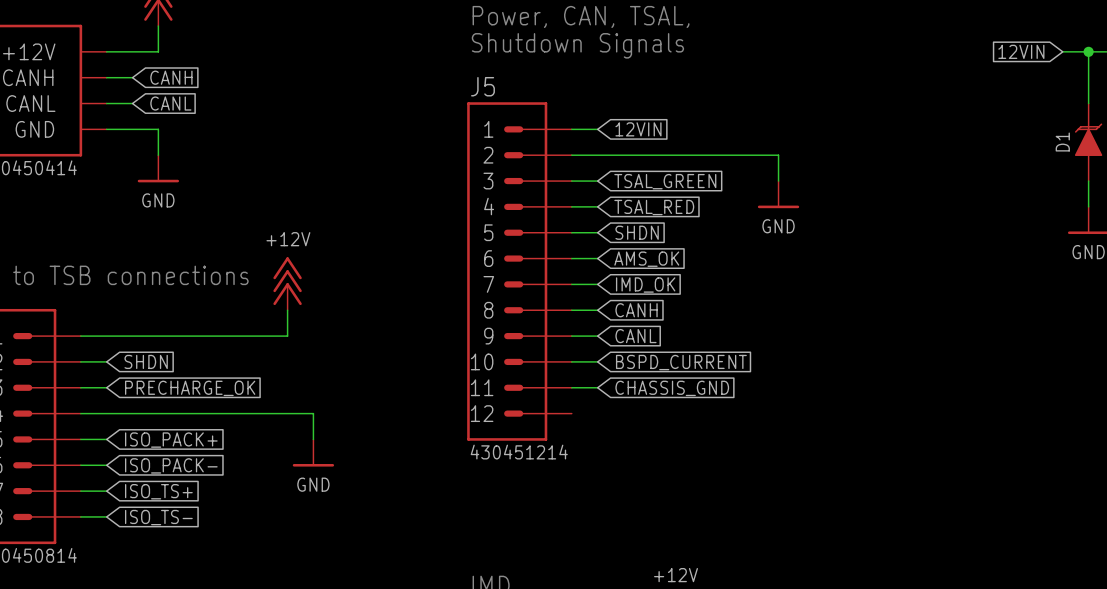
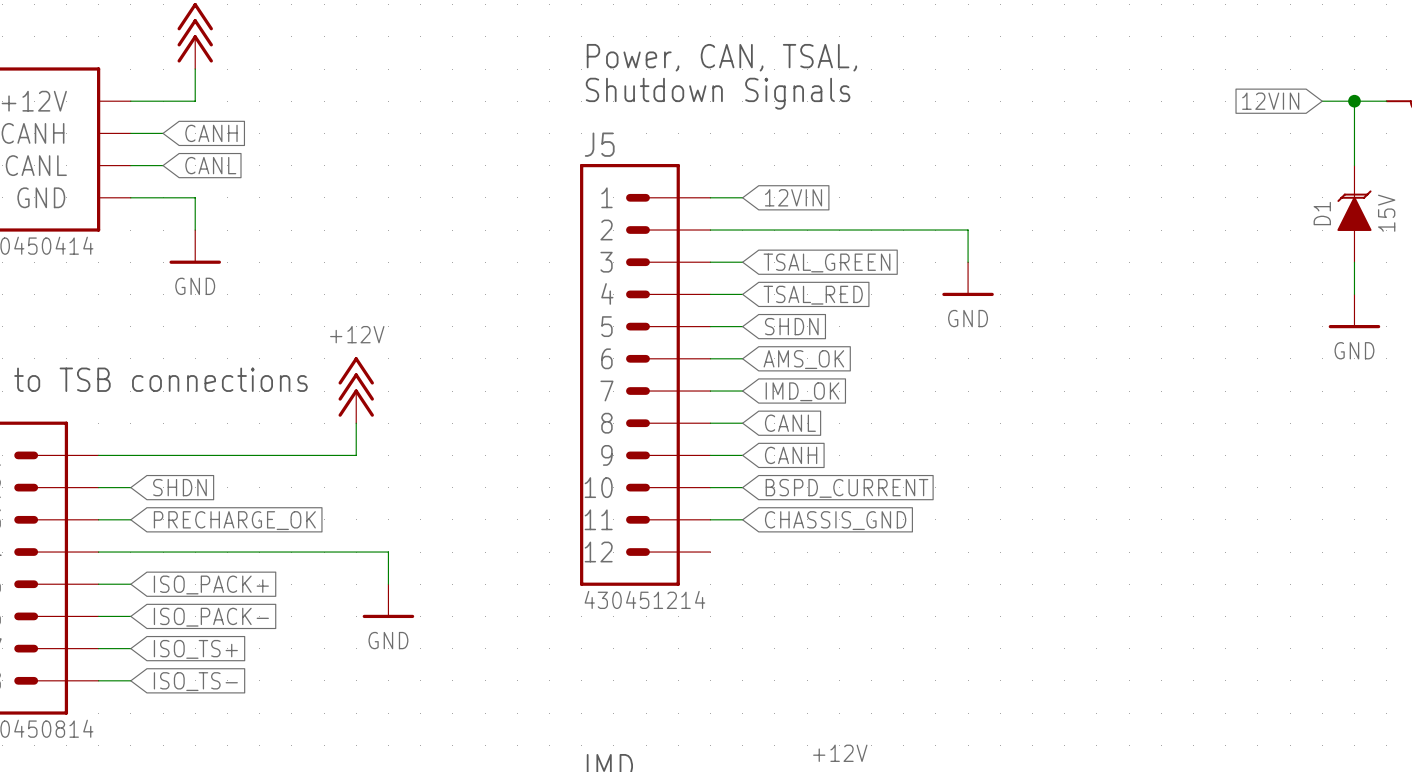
global label: CANH (636, 310) -> CANL (790, 423)
global label: CANL (635, 336) -> CANH (791, 455)

